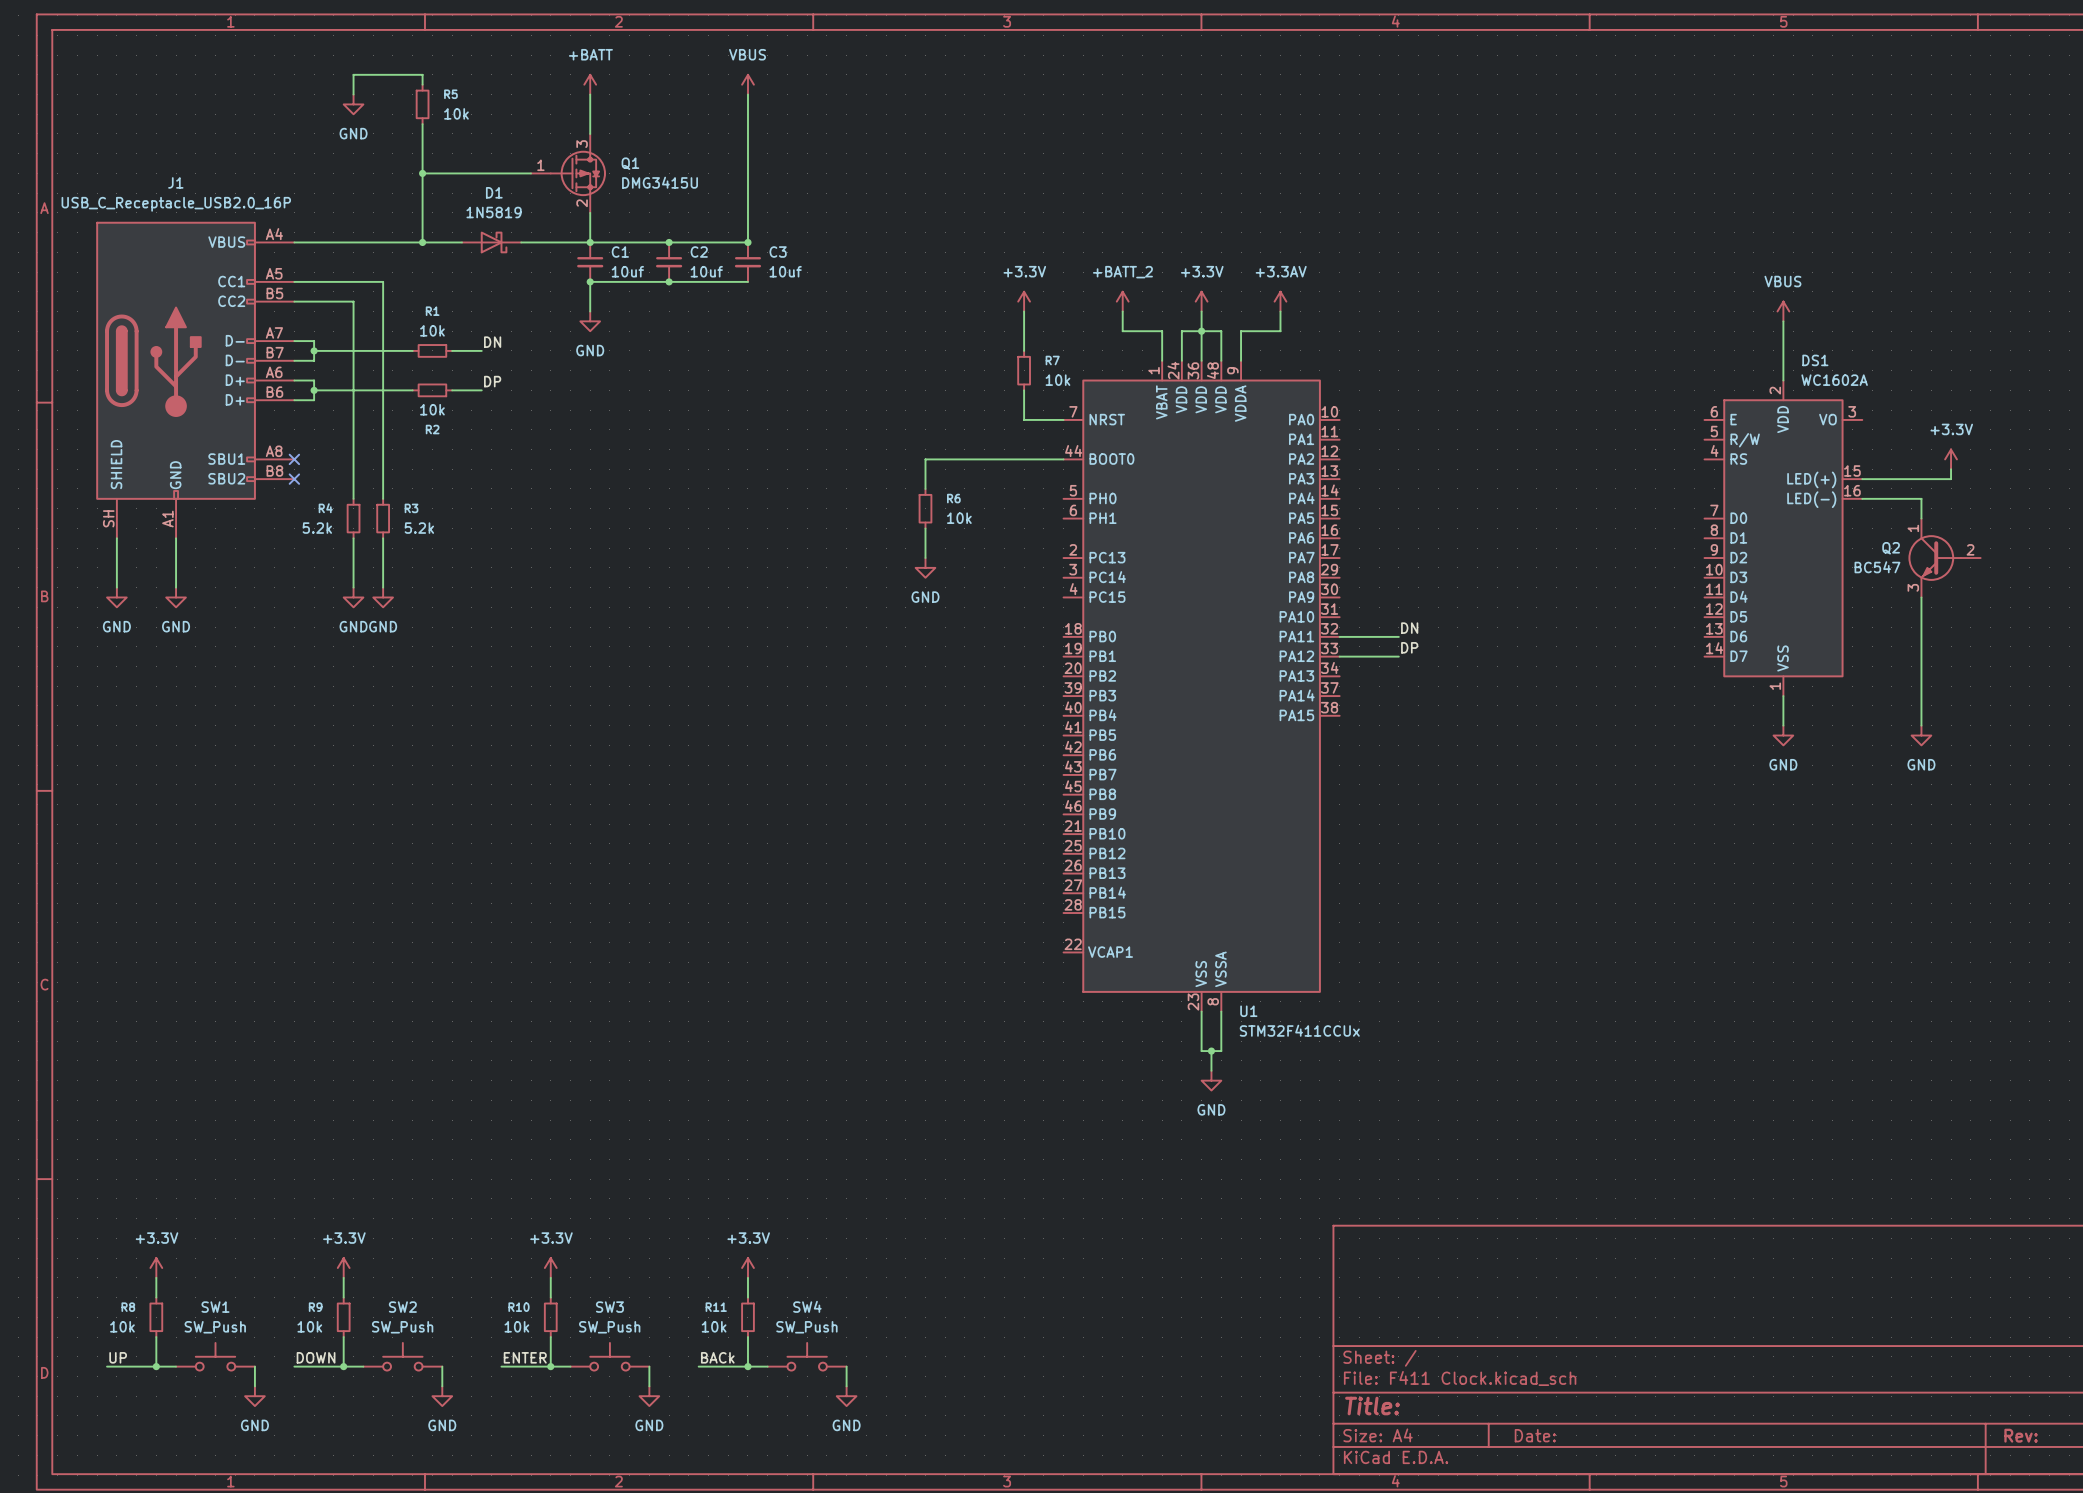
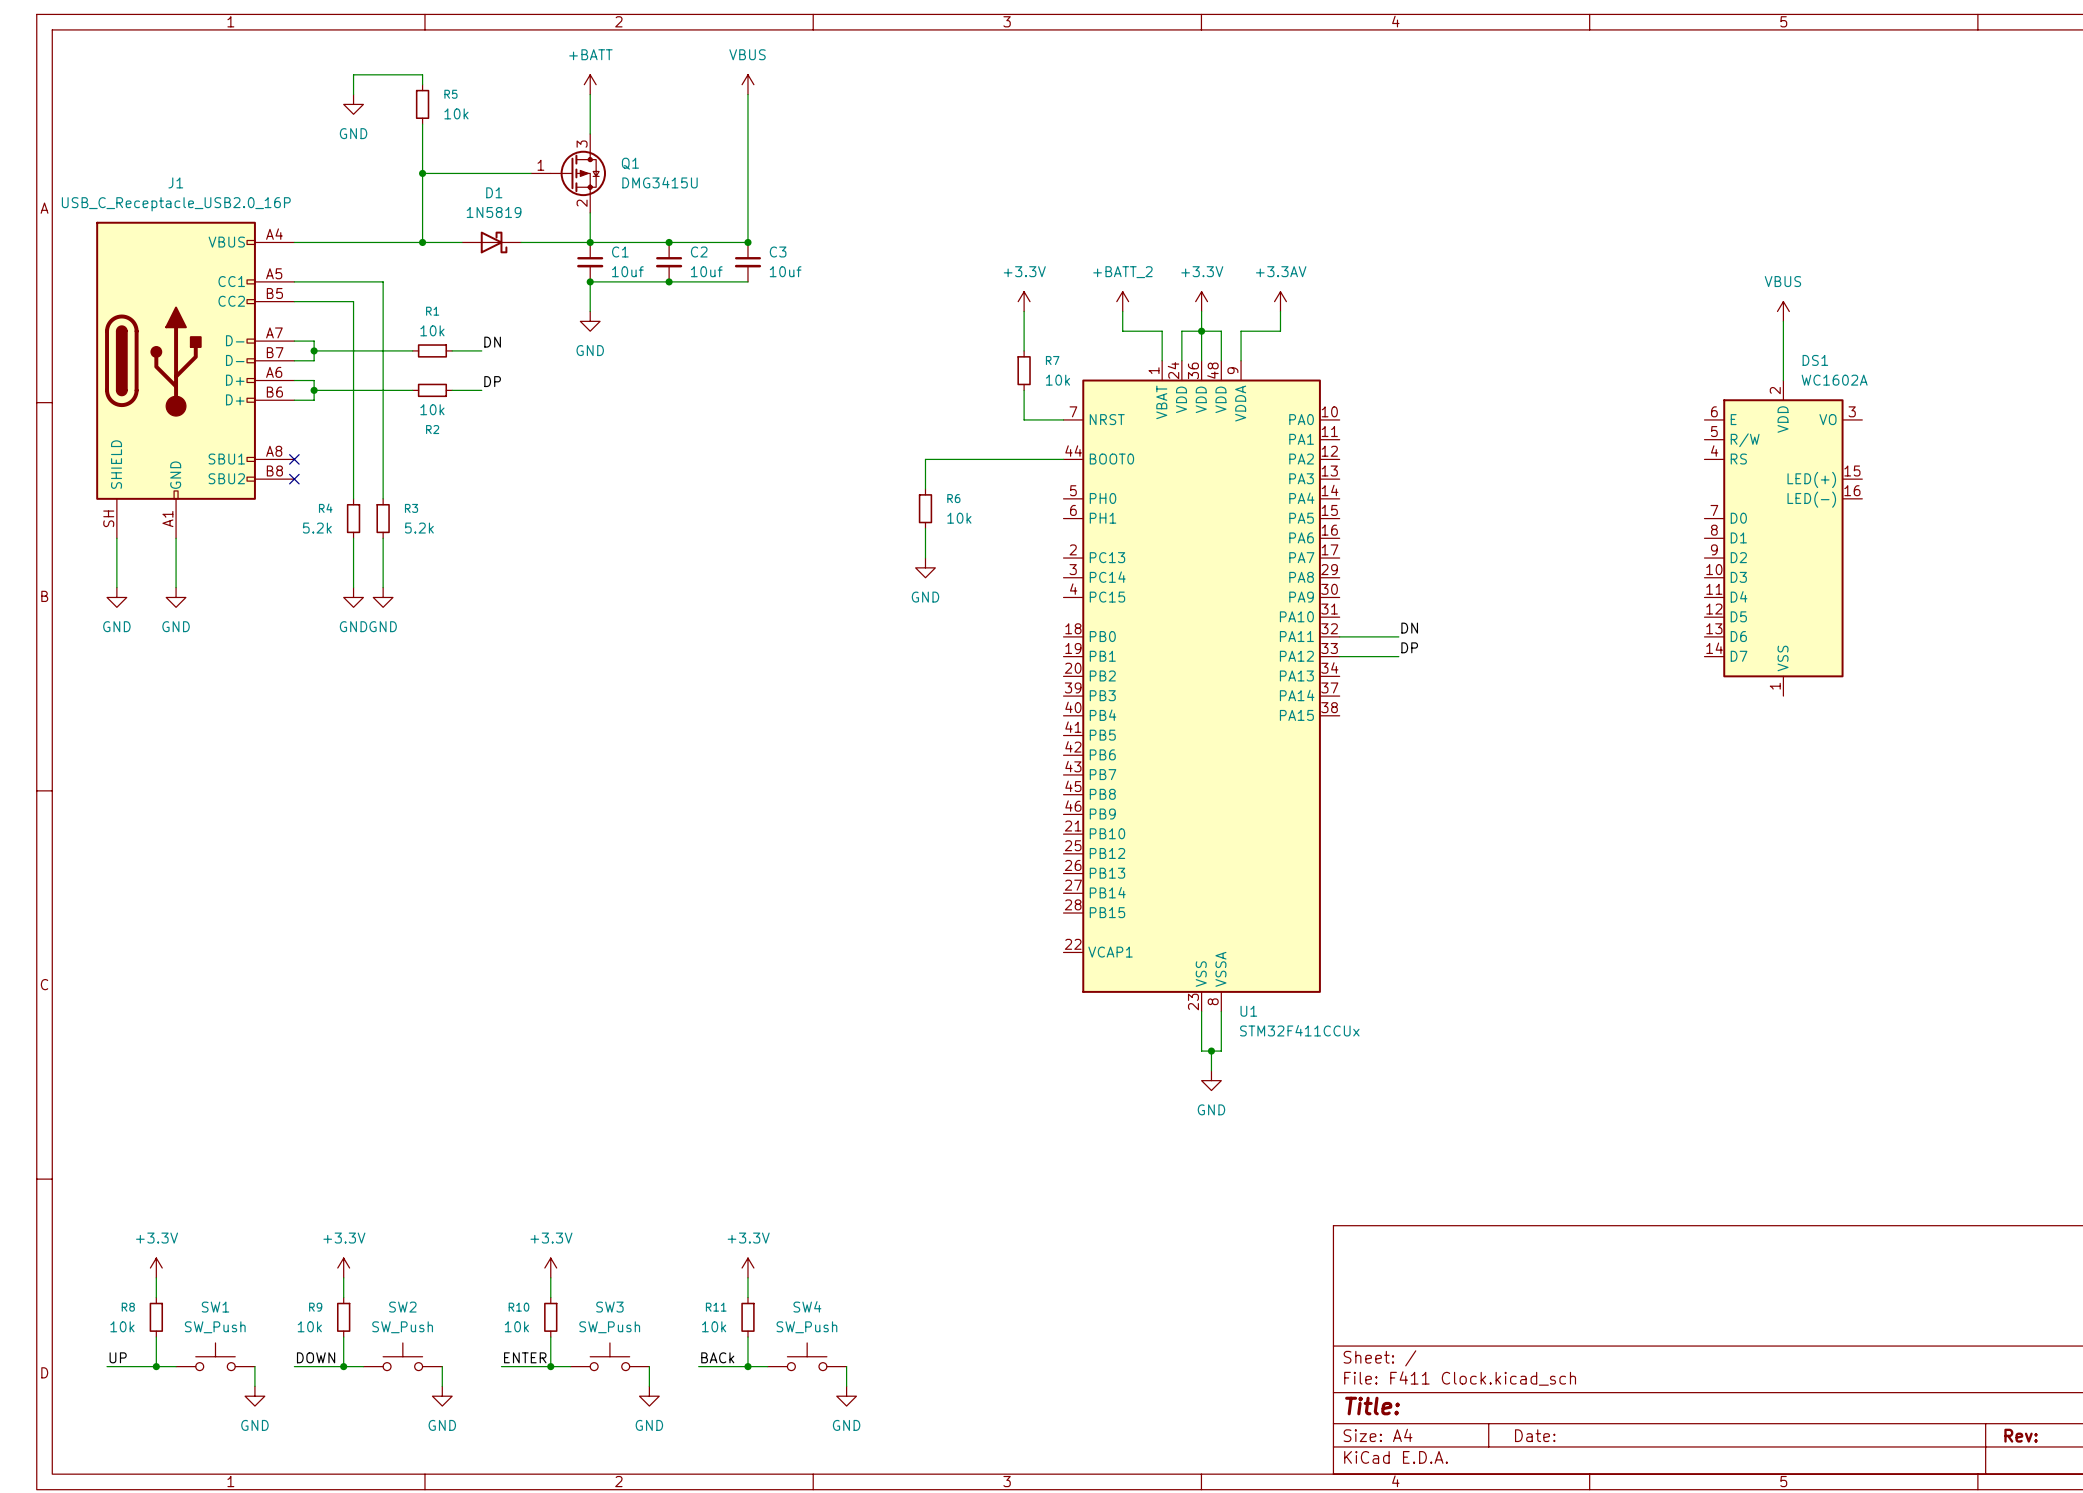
power symbol: +3.3V (1951, 459) -> none
wire: (1951, 469) (1951, 479) (1862, 479) -> none
wire: (1862, 498) (1921, 498) (1921, 518) -> none
Q2: BC547 (1944, 558) -> none
wire: (1921, 597) (1921, 725) -> none
wire: (1783, 696) (1783, 725) -> none
power symbol: GND (1783, 735) -> none
power symbol: GND (1921, 735) -> none

